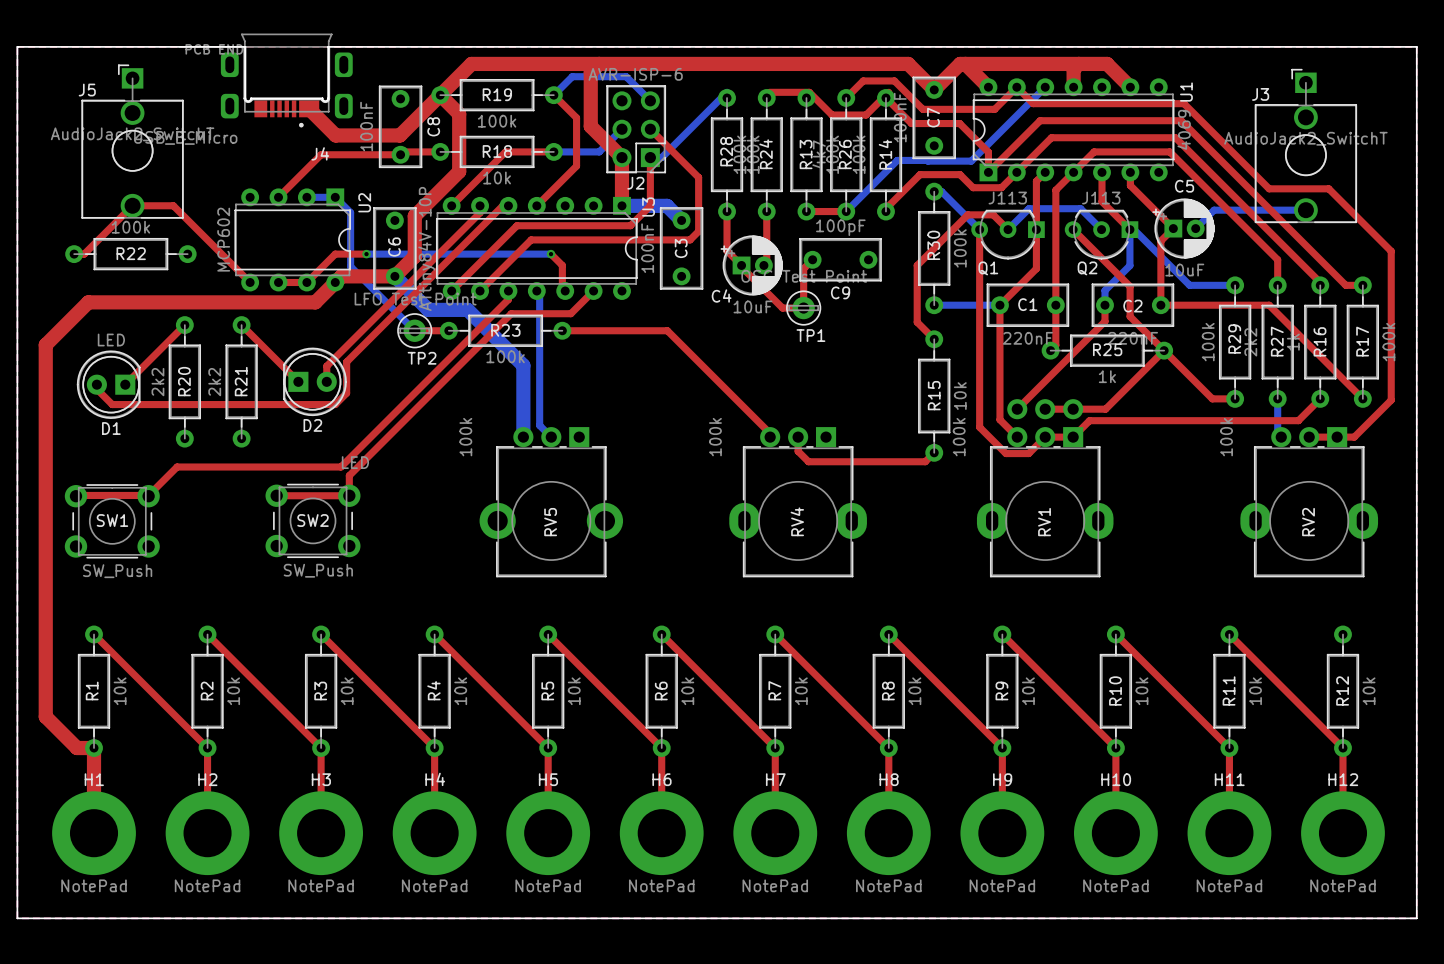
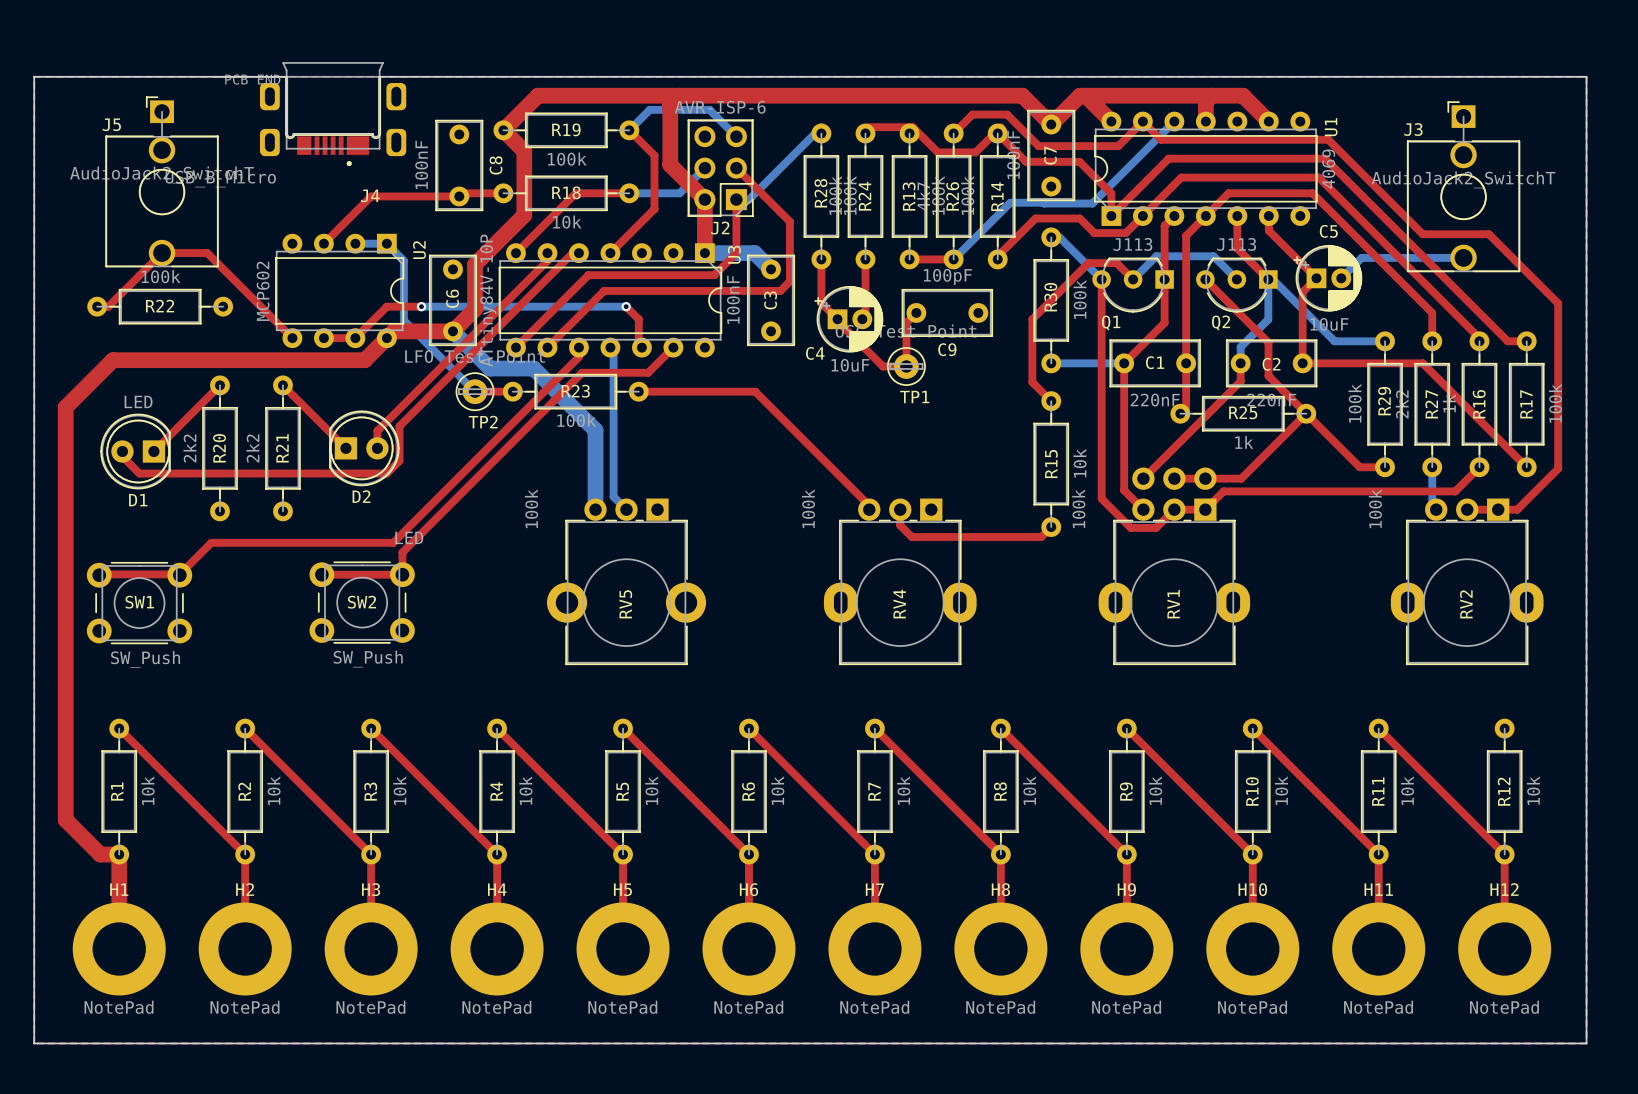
top track: (440, 95) (400, 135) (335, 135) (309, 108) -> none

